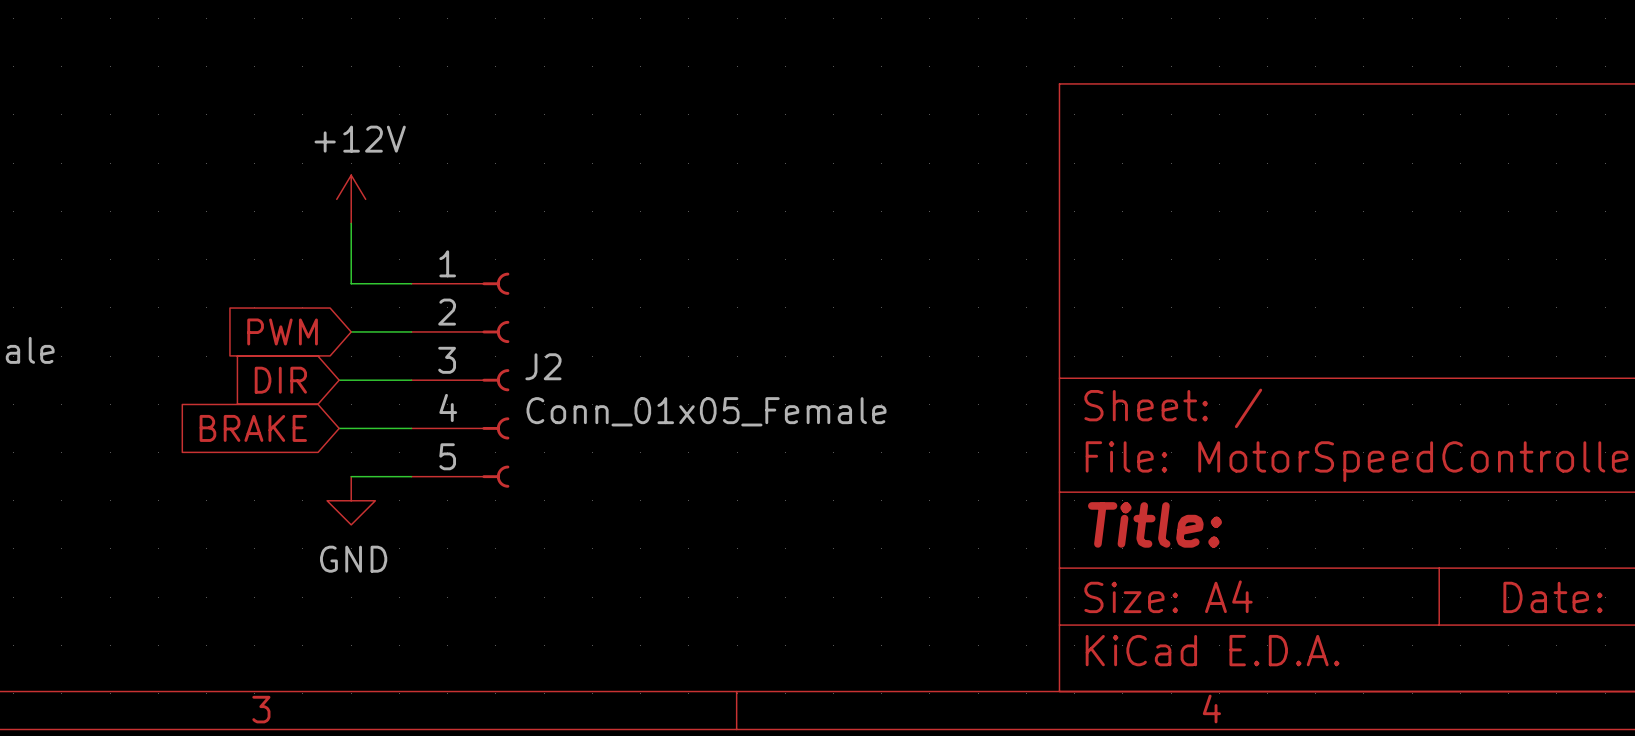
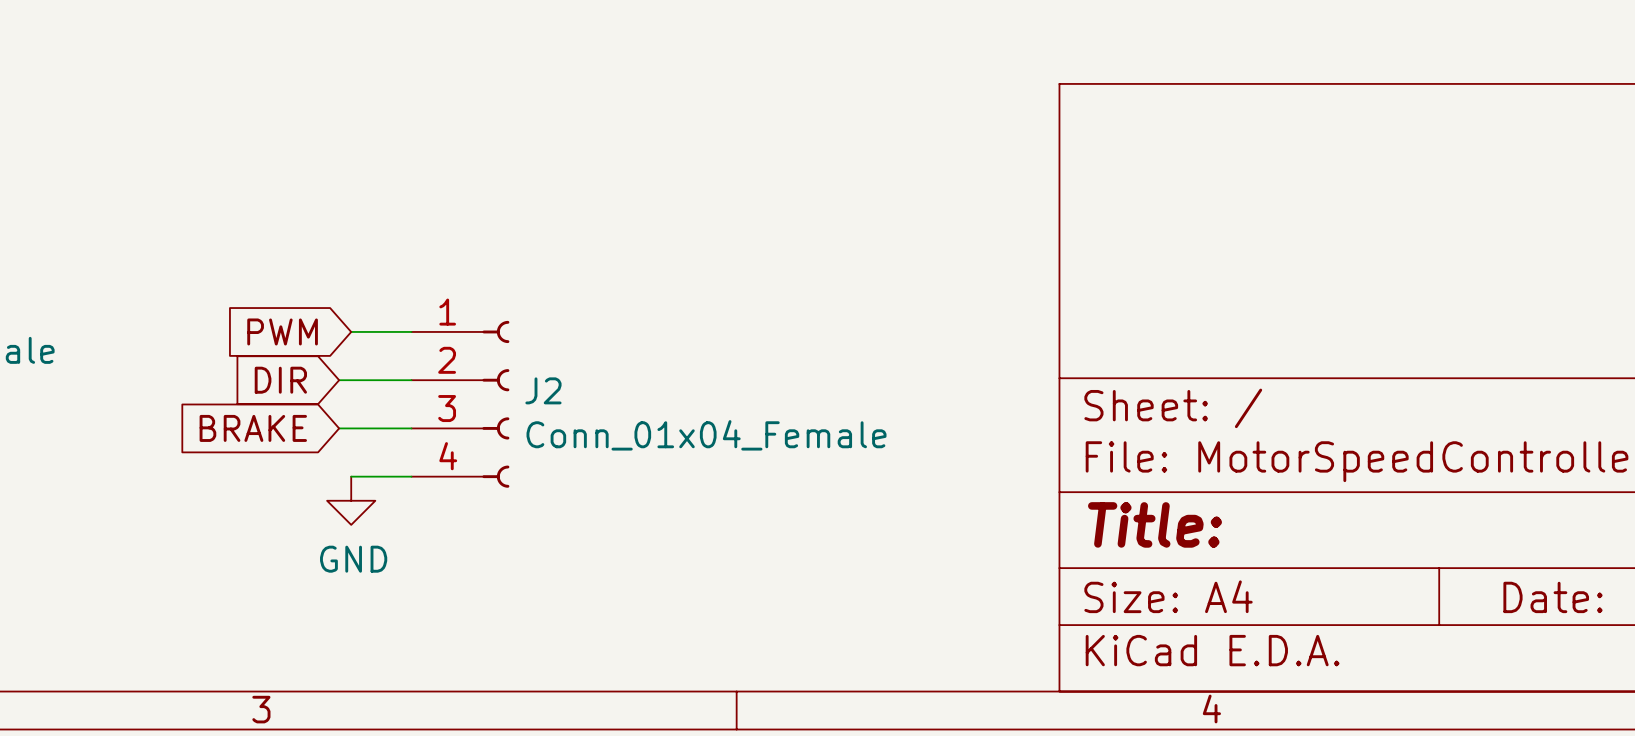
power symbol: +12V (351, 199) -> none
wire: (351, 223) (351, 283) (411, 283) -> none
J2 symbol: [411, 272, 510, 488] -> [411, 320, 510, 488]
J2 value: Conn_01x05_Female (706, 411) -> Conn_01x04_Female (706, 435)

